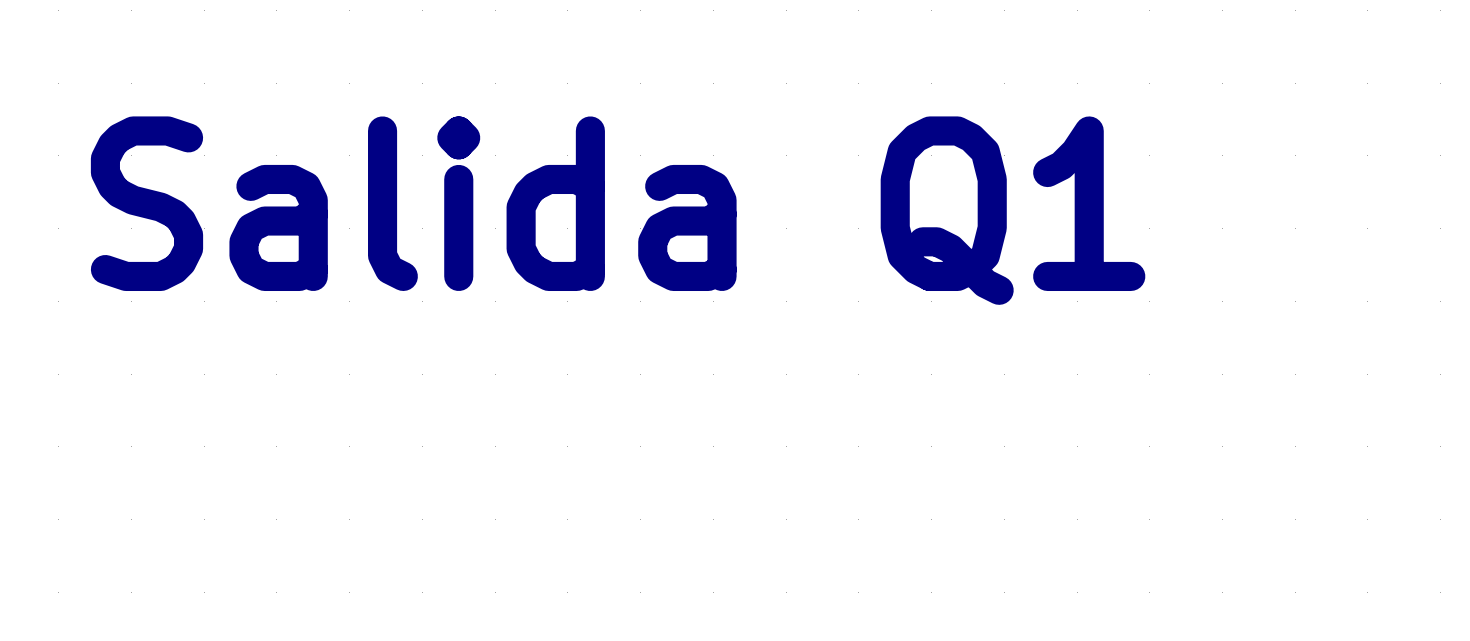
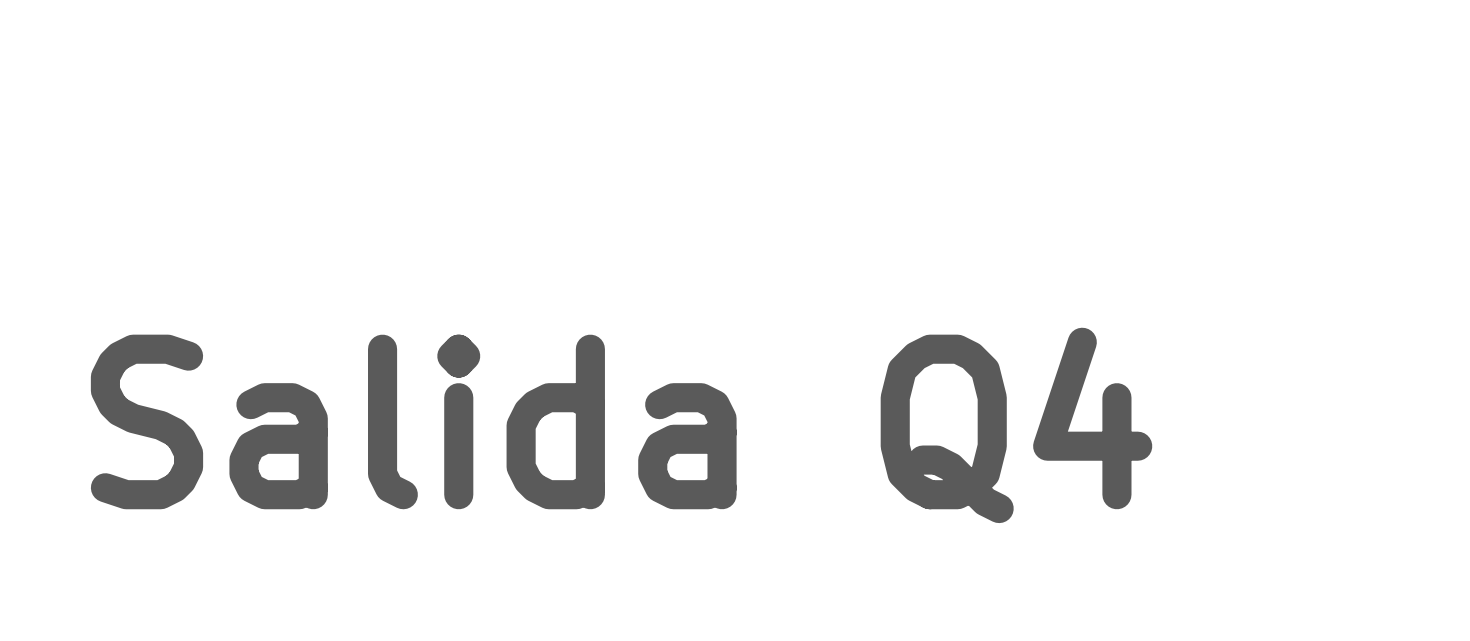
text: Salida Q1 (618, 210) -> Salida Q4 (621, 425)

